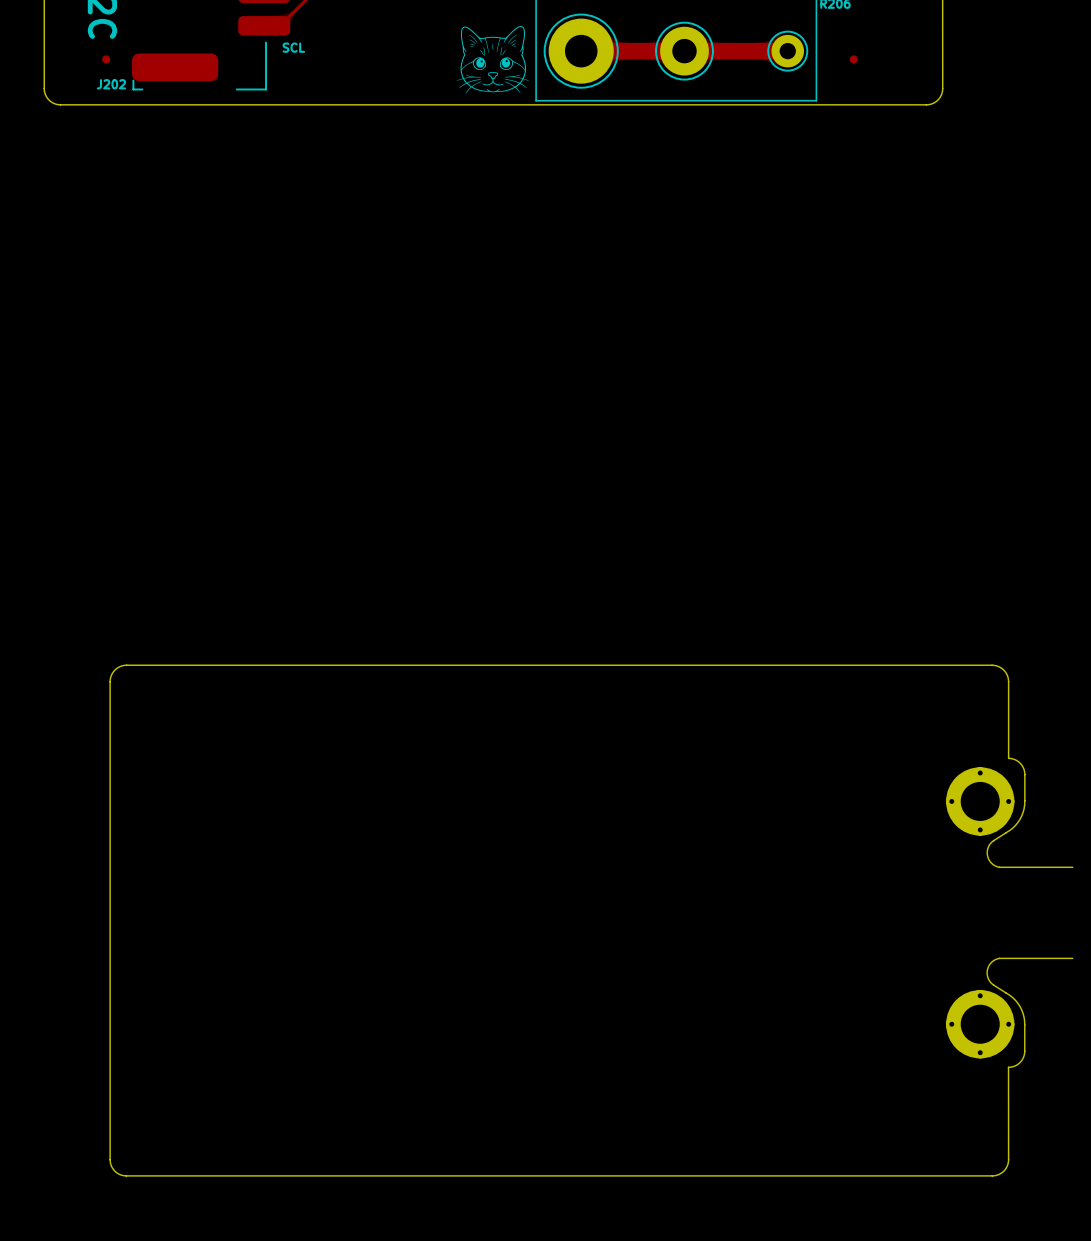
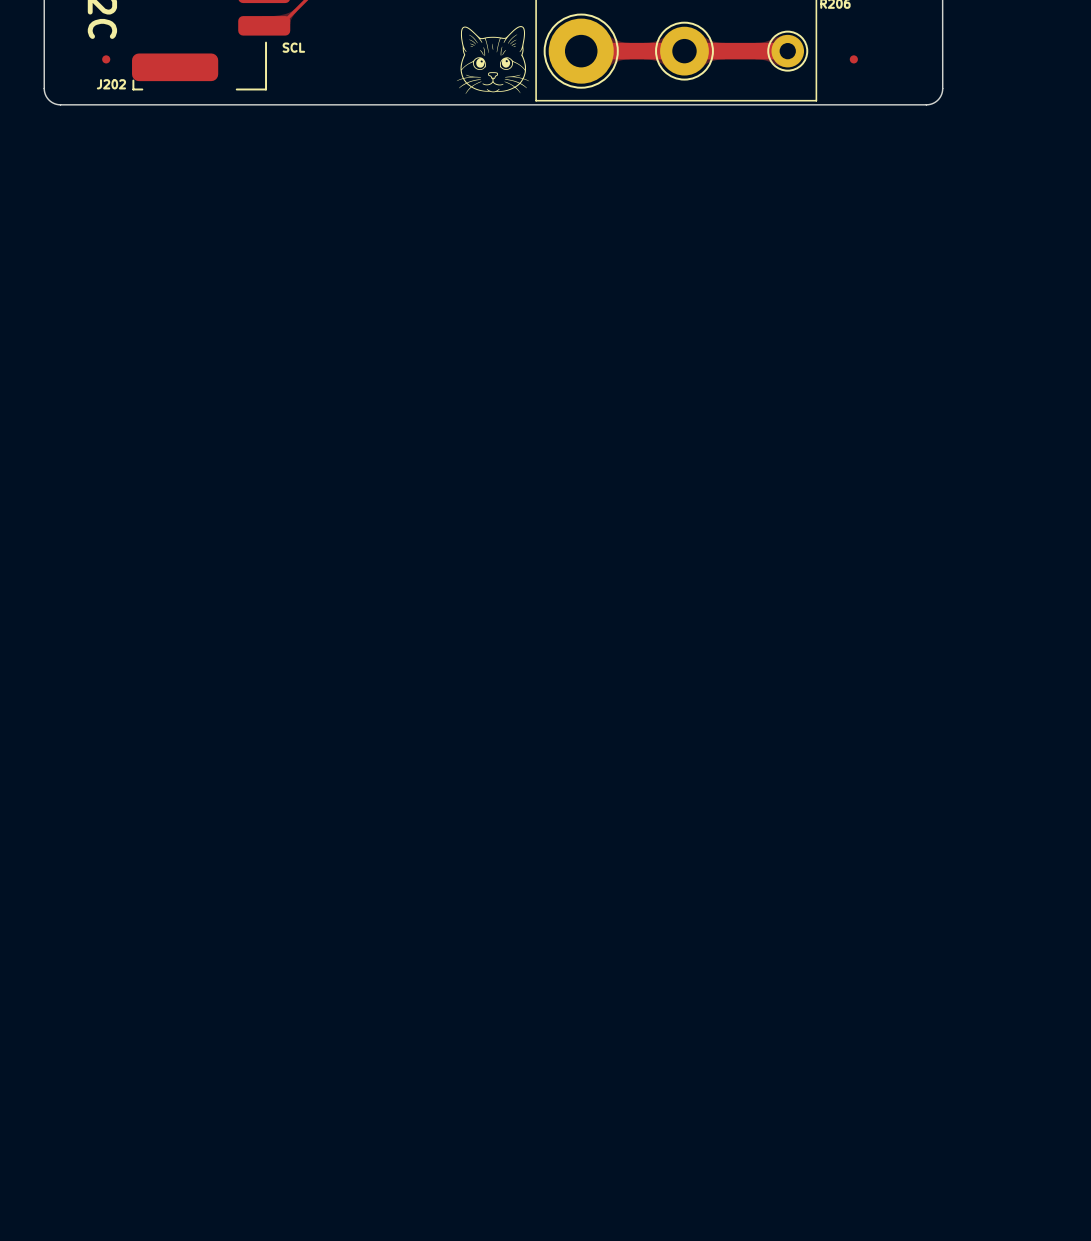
part: (980, 801) -> none
board edge: (993, 840) (988, 847) (987, 855) (991, 863) (997, 866) (1072, 867) -> none
board edge: (993, 840) (1017, 822) (1023, 812) (1024, 800) (1023, 768) (1016, 760) (1008, 758) (1008, 677) (1003, 670) (996, 665) (120, 666) (112, 673) (110, 681) (110, 1163) (116, 1172) (126, 1175) (995, 1175) (1003, 1171) (1008, 1161) (1008, 1067) (1020, 1062) (1024, 1051) (1023, 1013) (1017, 1002) (1005, 992) -> none
board edge: (1072, 958) (999, 958) (994, 960) (987, 968) (988, 978) (992, 984) (1005, 992) -> none
part: (980, 1024) -> none

